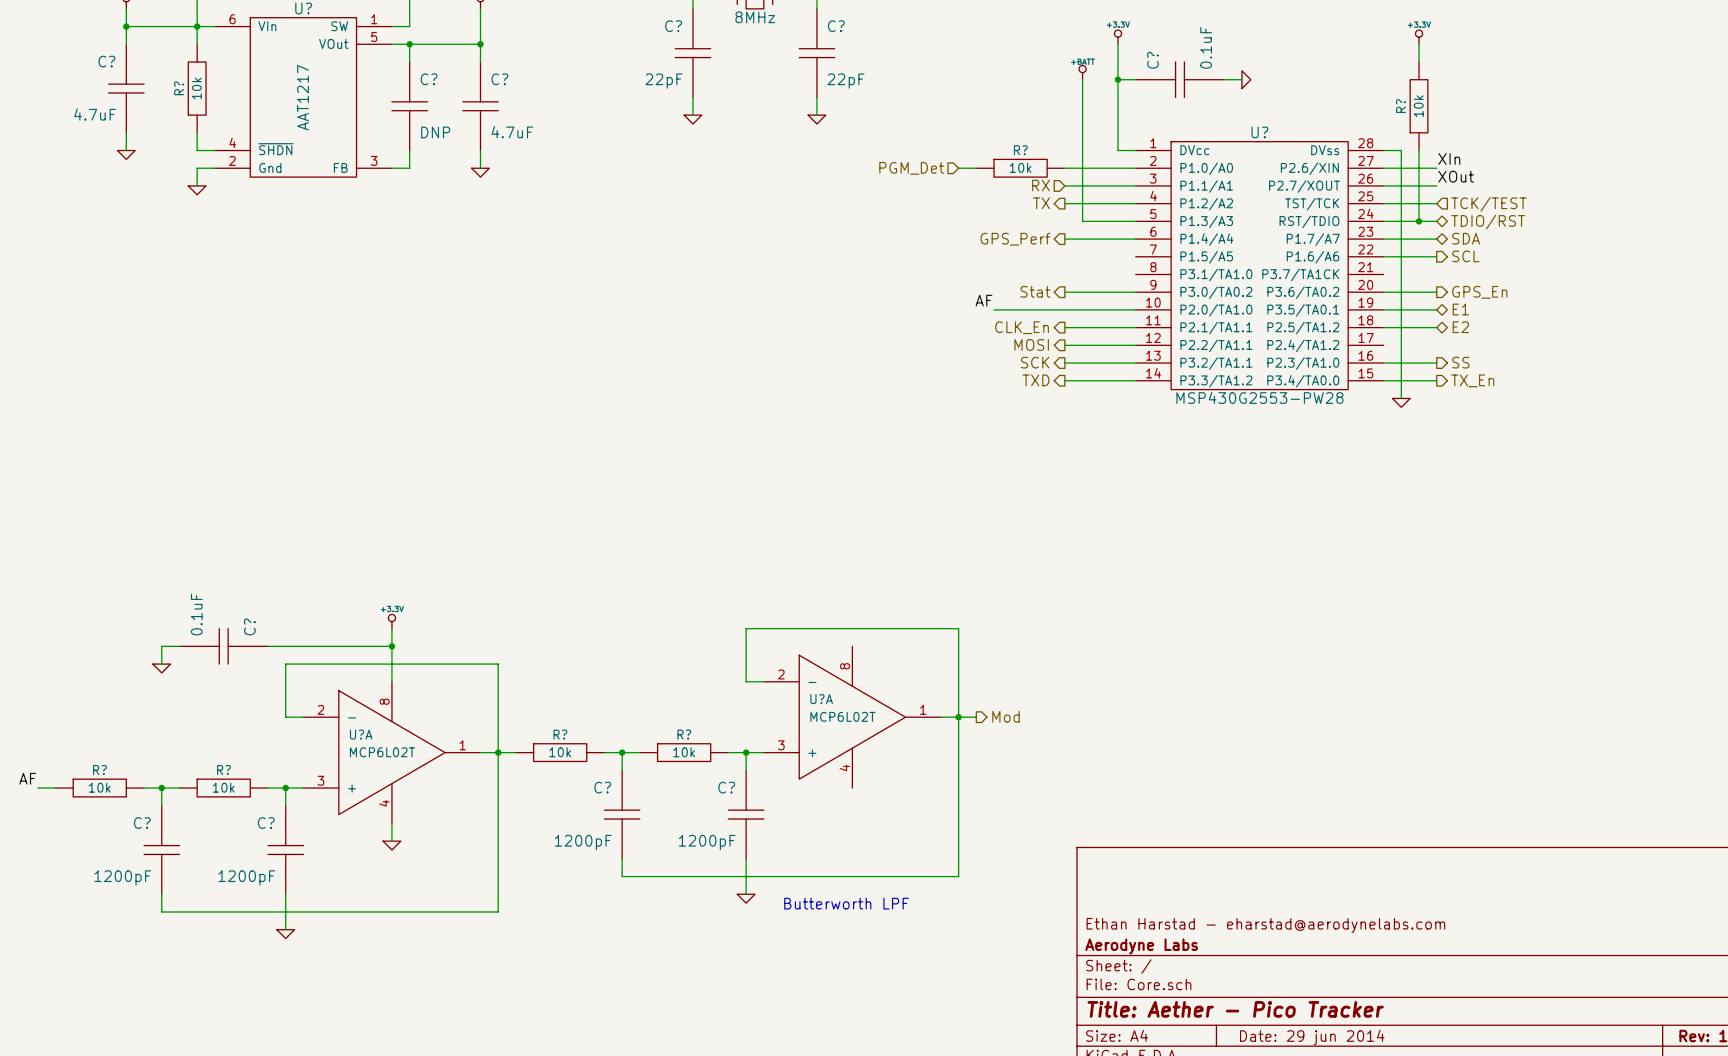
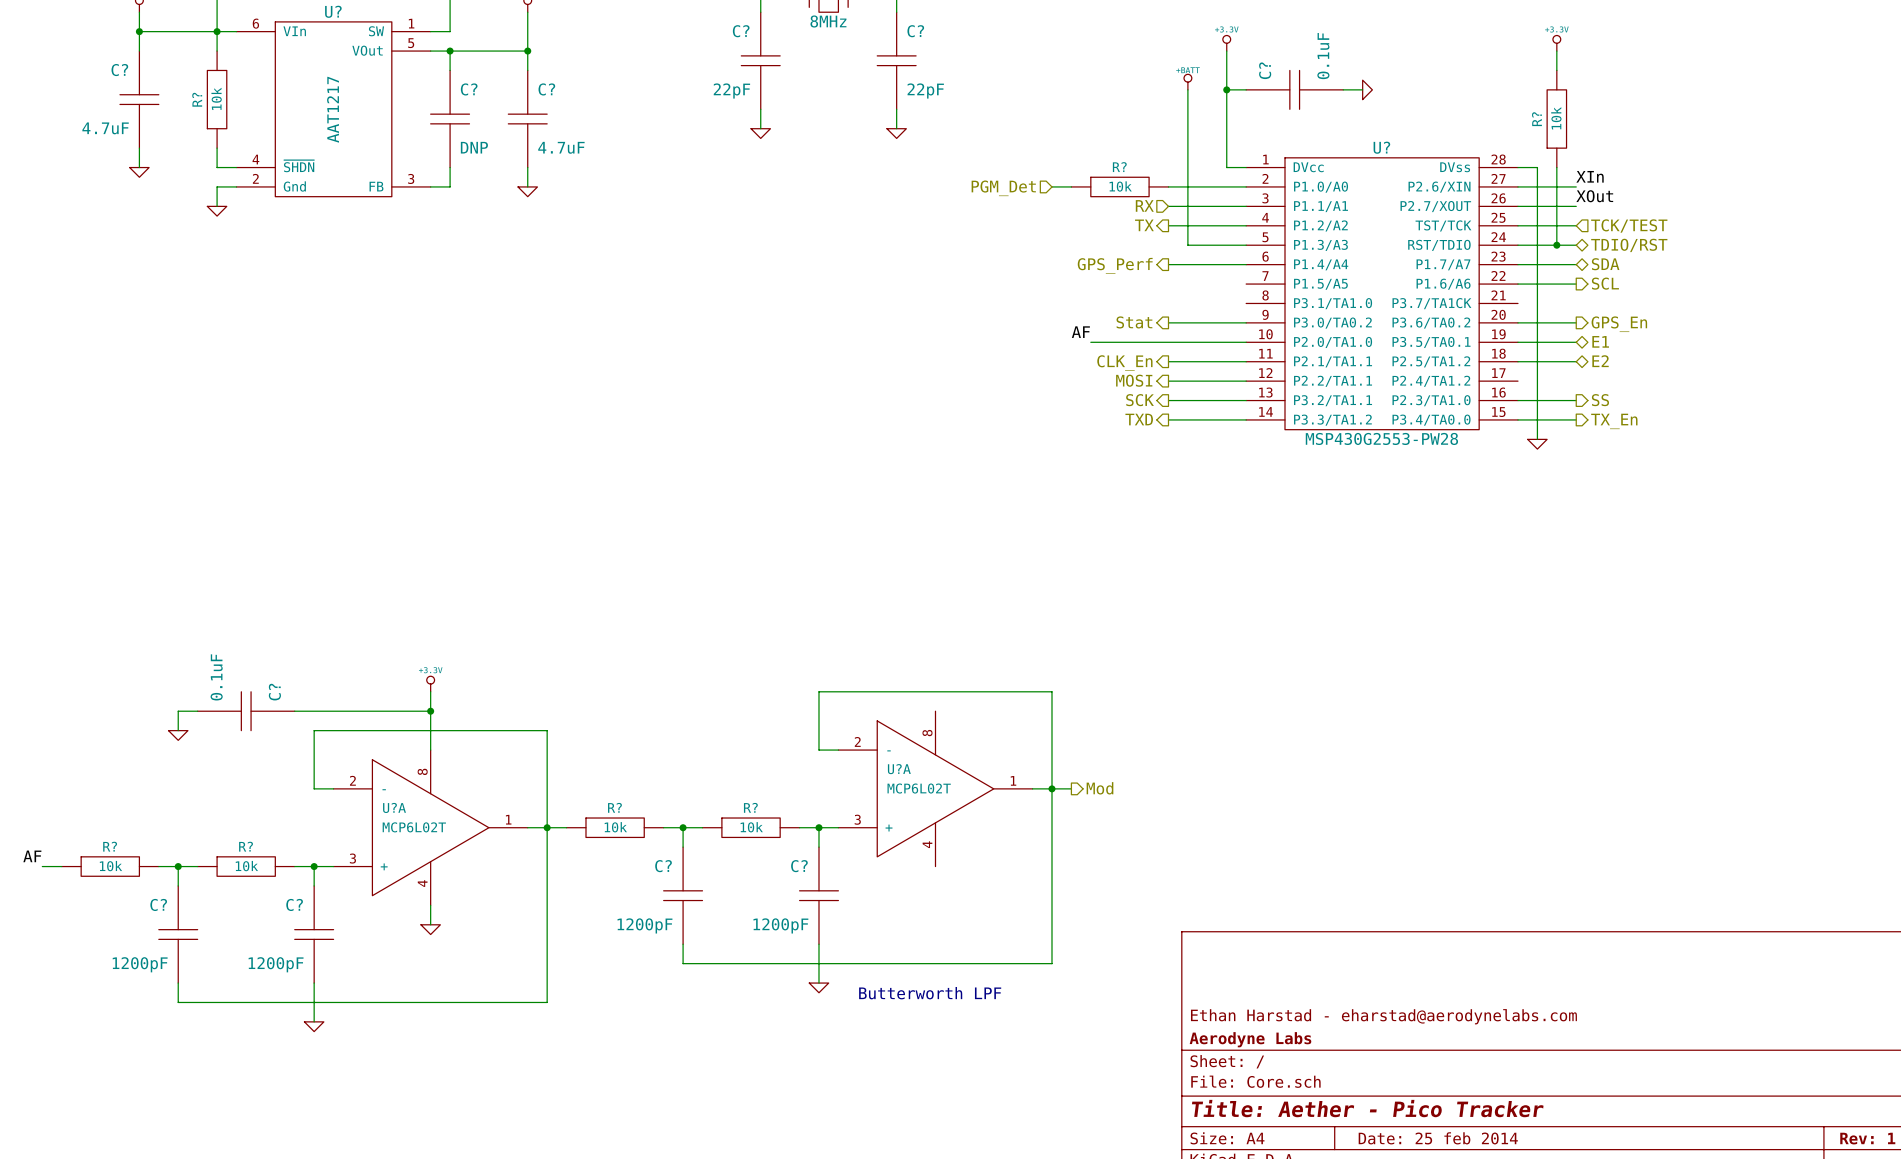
title block: Date: 29 jun 2014 (1312, 1037) -> Date: 25 feb 2014 (1438, 1138)

